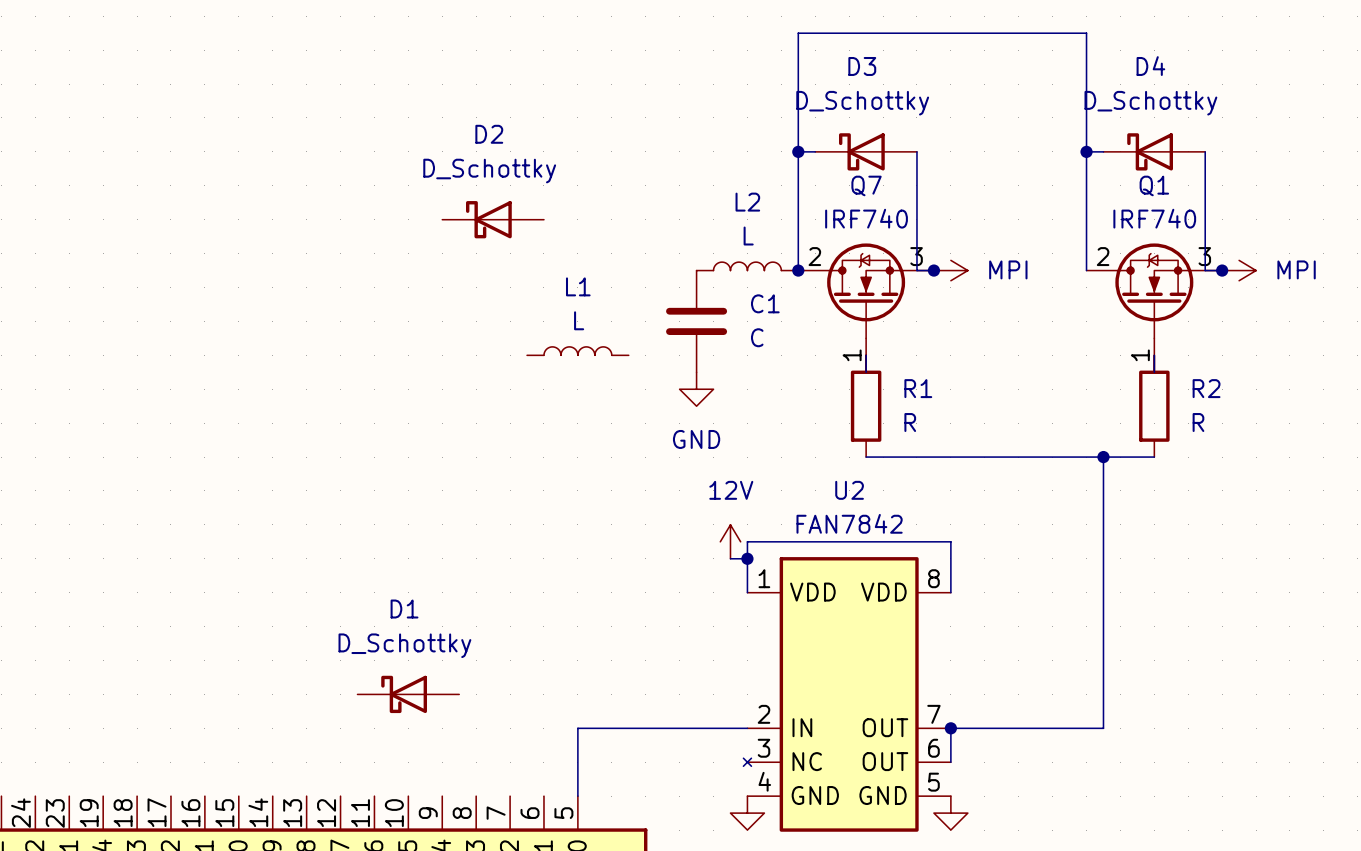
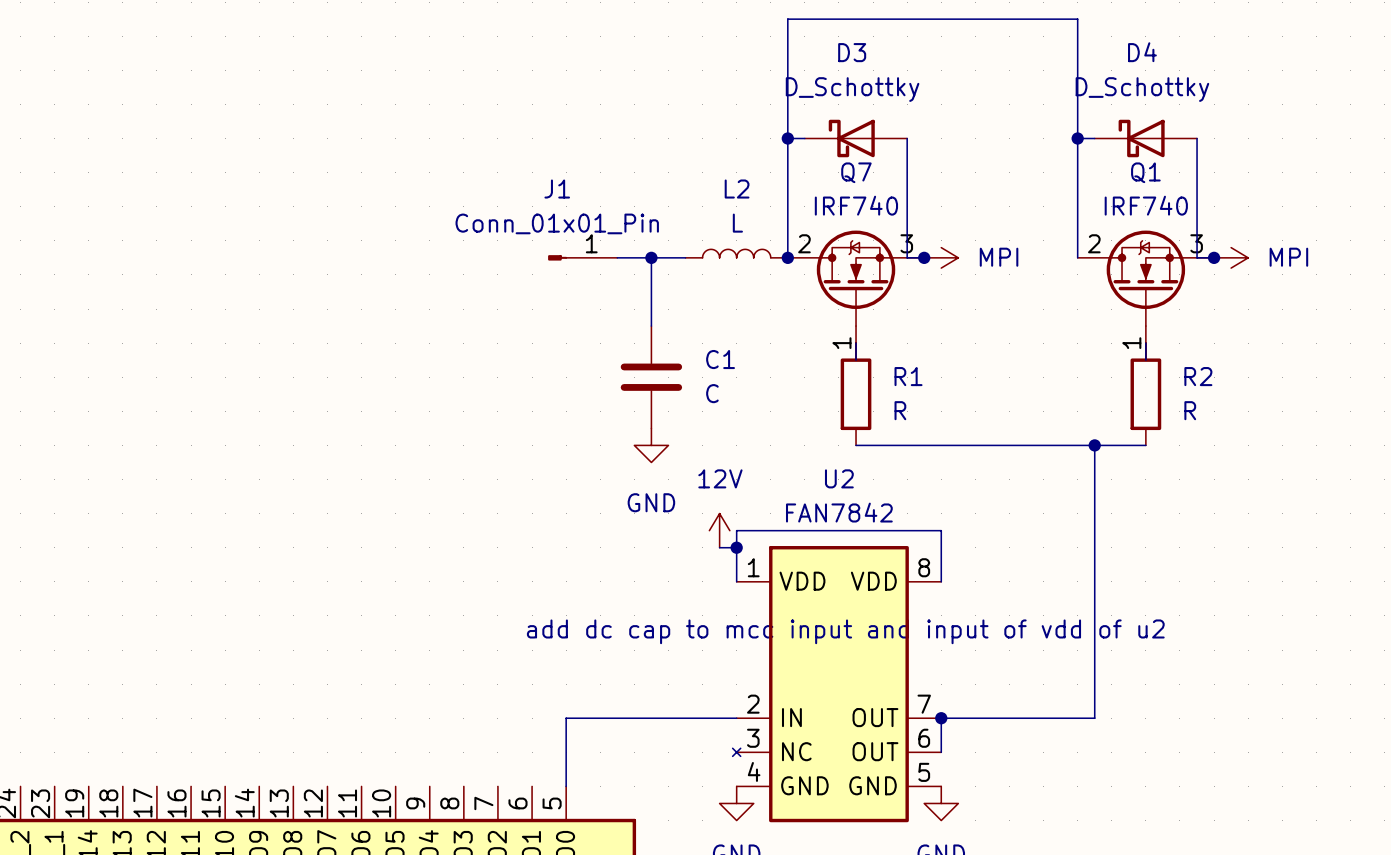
D2: D_Schottky (493, 219) -> none
J1: none -> Conn_01x01_Pin (582, 257)
wire: none -> (617, 257) (685, 257)
wire: none -> (651, 257) (651, 326)
junction: none -> (651, 257)
C1 position: (696, 321) -> (651, 377)
L1: L (577, 351) -> none
power symbol position: GND (696, 389) -> GND (651, 445)
power symbol text position: GND (696, 439) -> GND (651, 502)
text: none -> add dc cap to mcc input and input of vdd of u2 (845, 631)
D1: D_Schottky (408, 694) -> none

